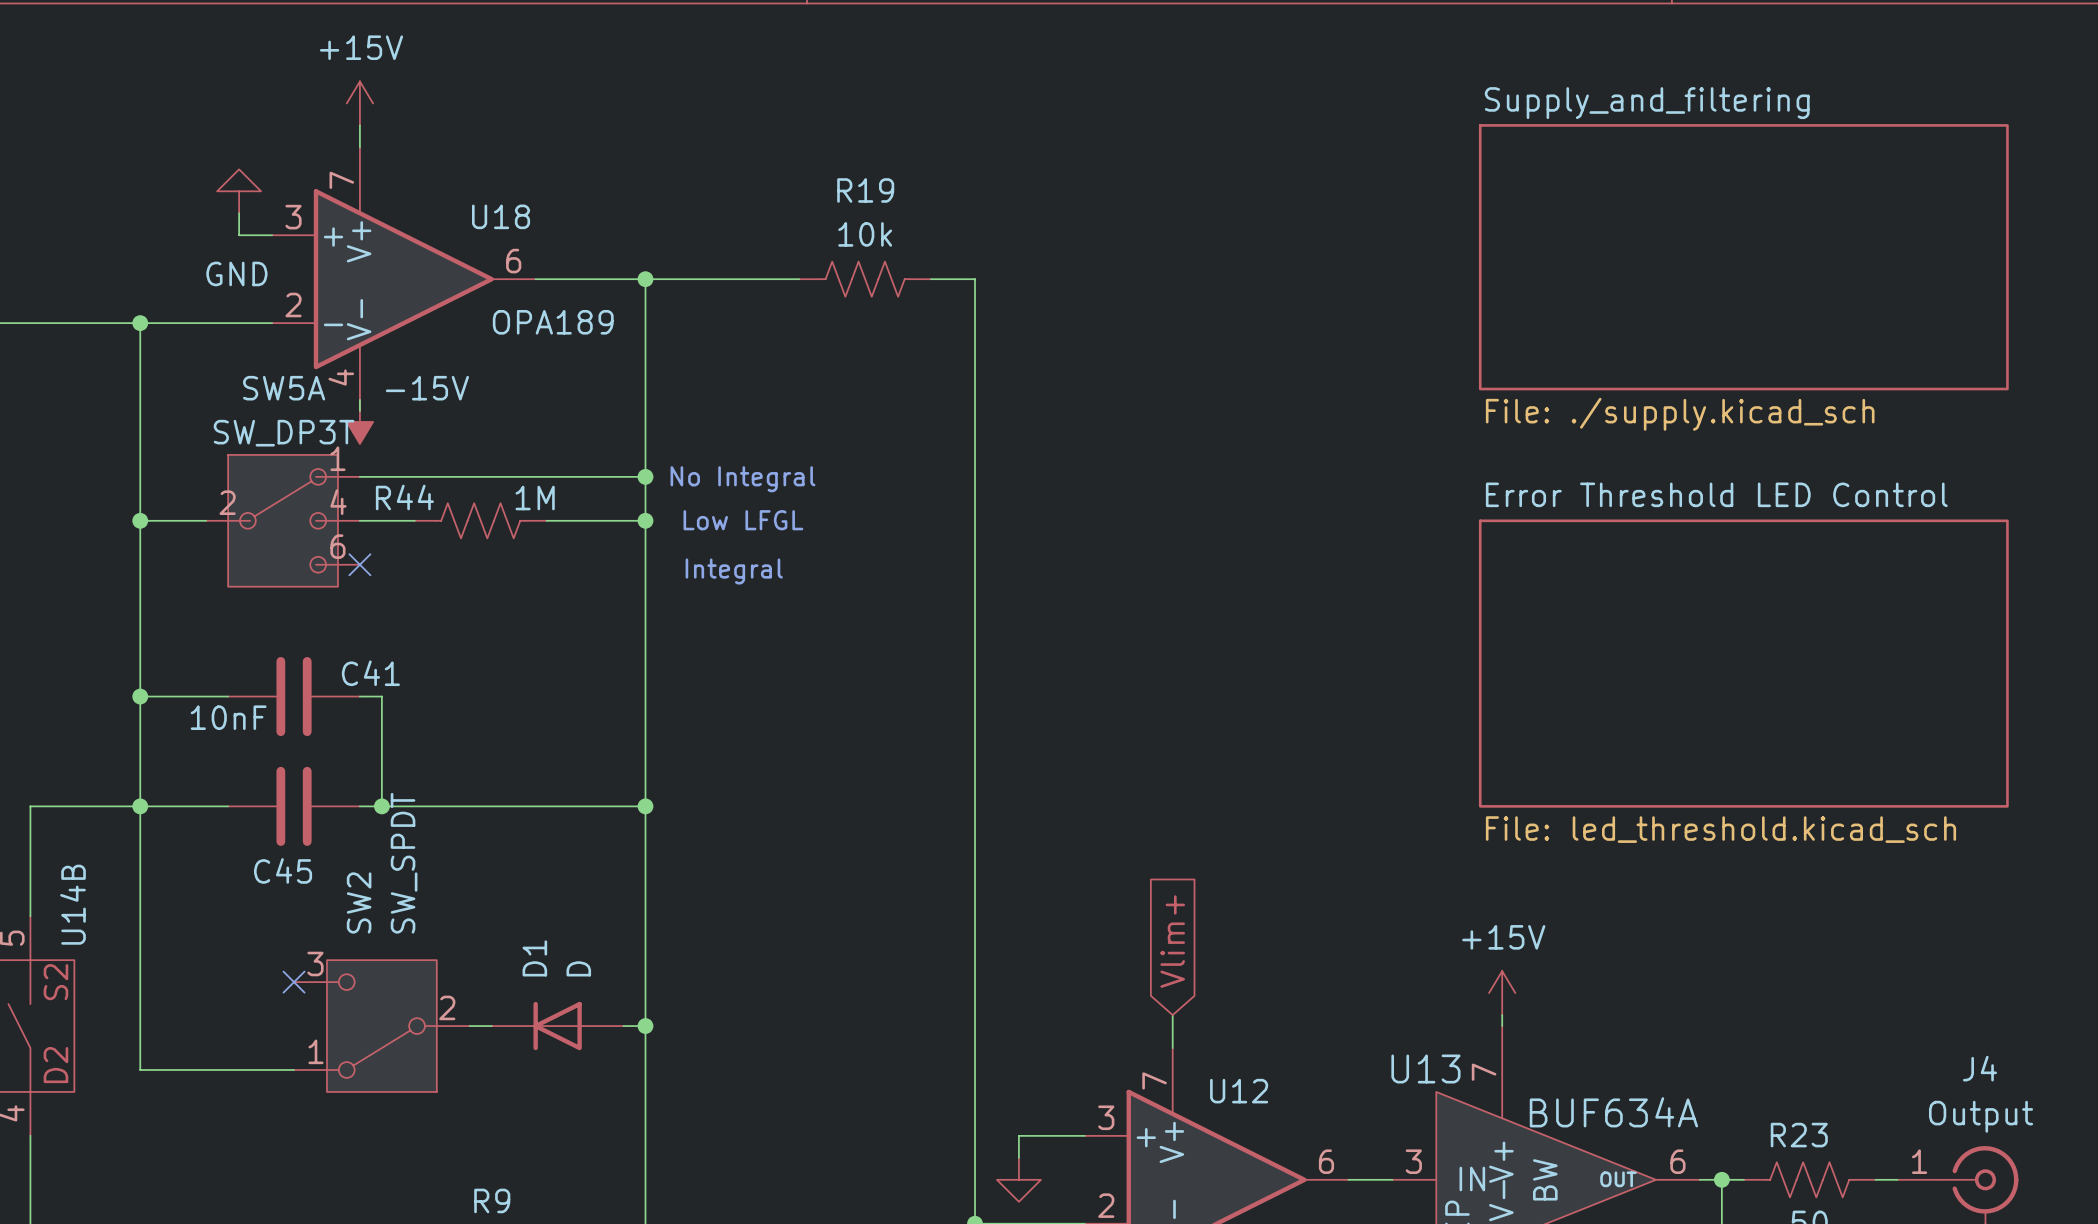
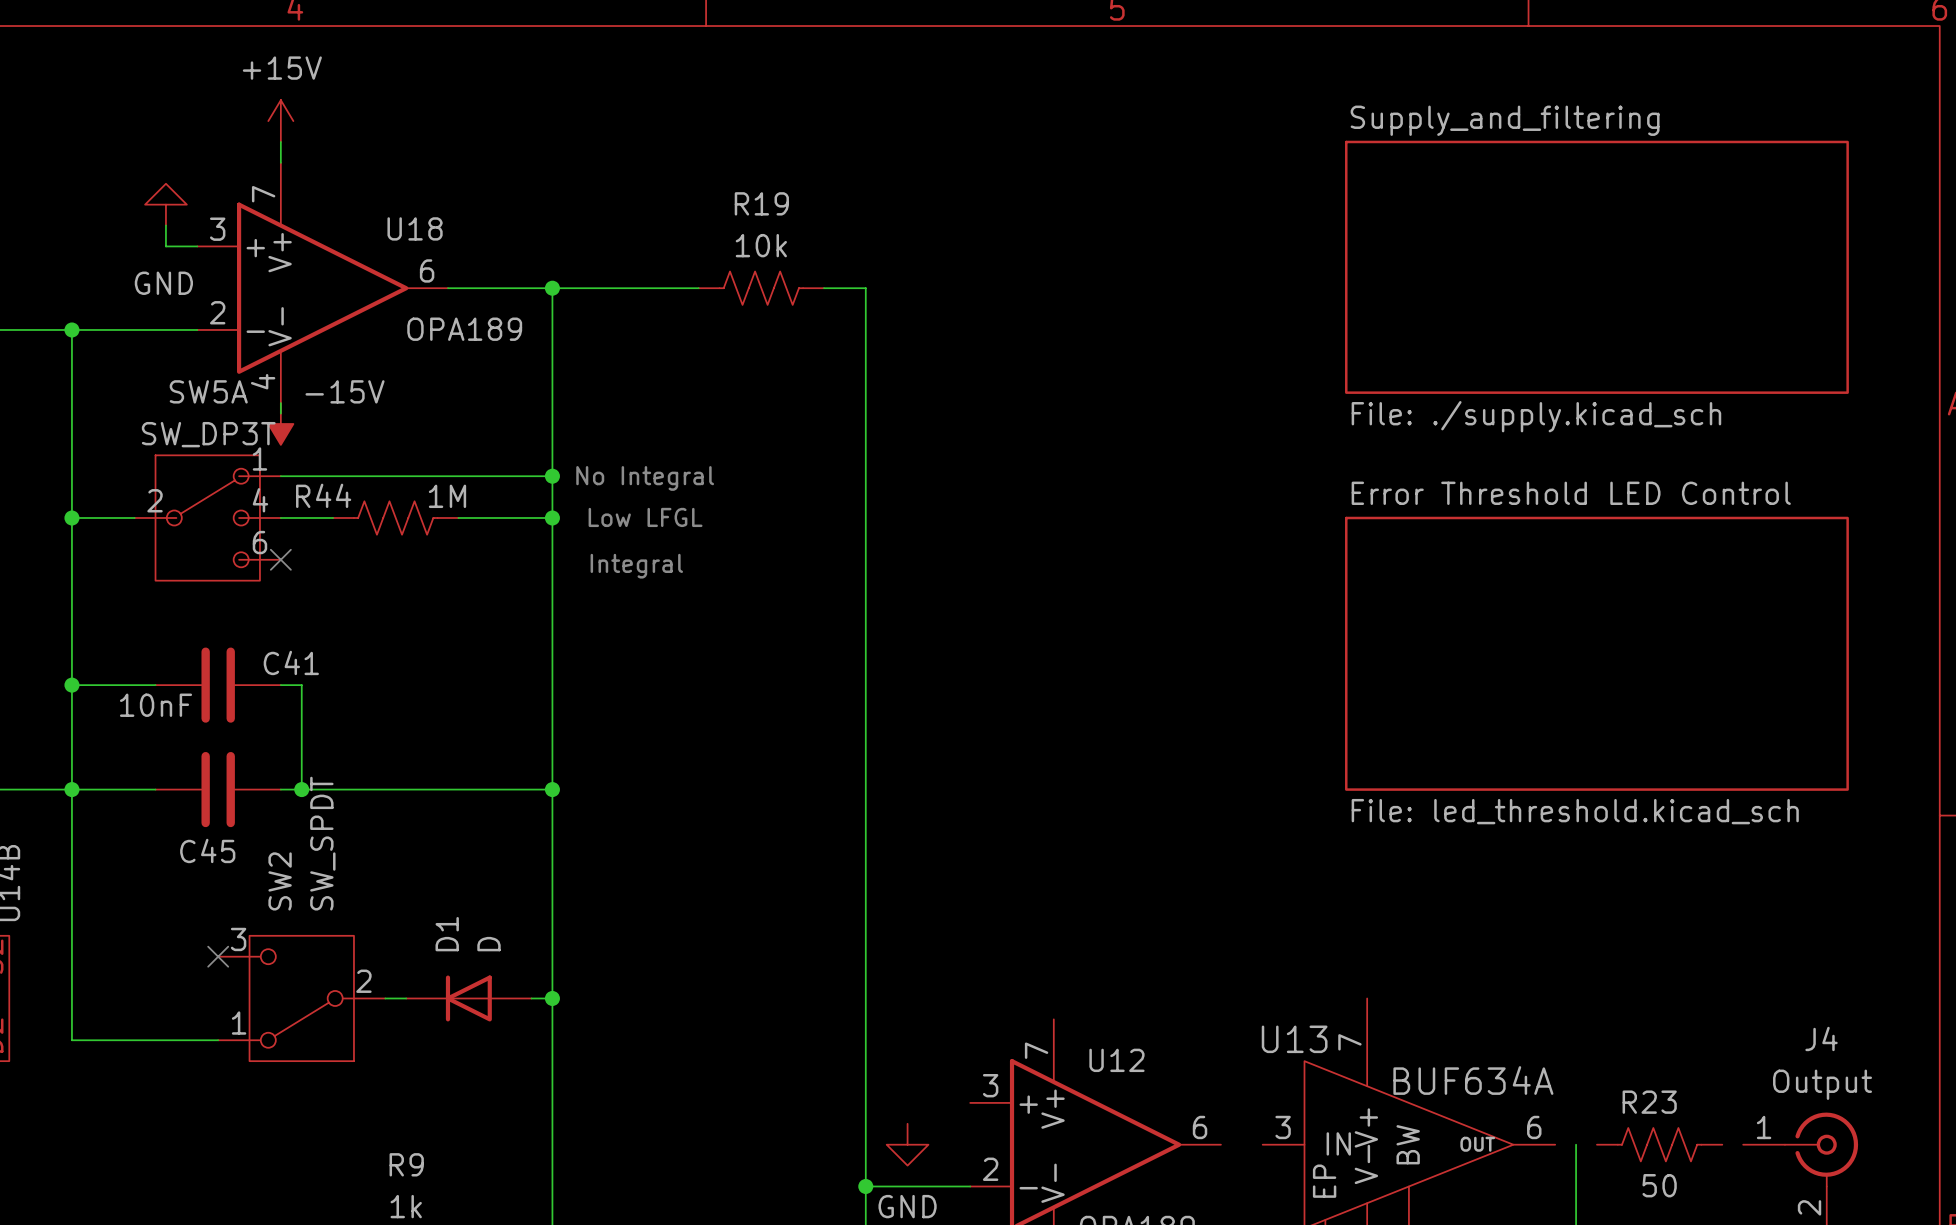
global label: Vlim+ (1172, 941) -> none
power symbol: +15V (1502, 993) -> none
wire: (1172, 1015) (1172, 1048) -> none
wire: (1502, 1015) (1502, 1026) -> none
wire: (1084, 1135) (1018, 1135) (1018, 1157) -> none
wire: (1348, 1179) (1392, 1179) -> none
wire: (1699, 1179) (1743, 1179) -> none
junction: (1721, 1179) -> none
wire: (1875, 1179) (1897, 1179) -> none

